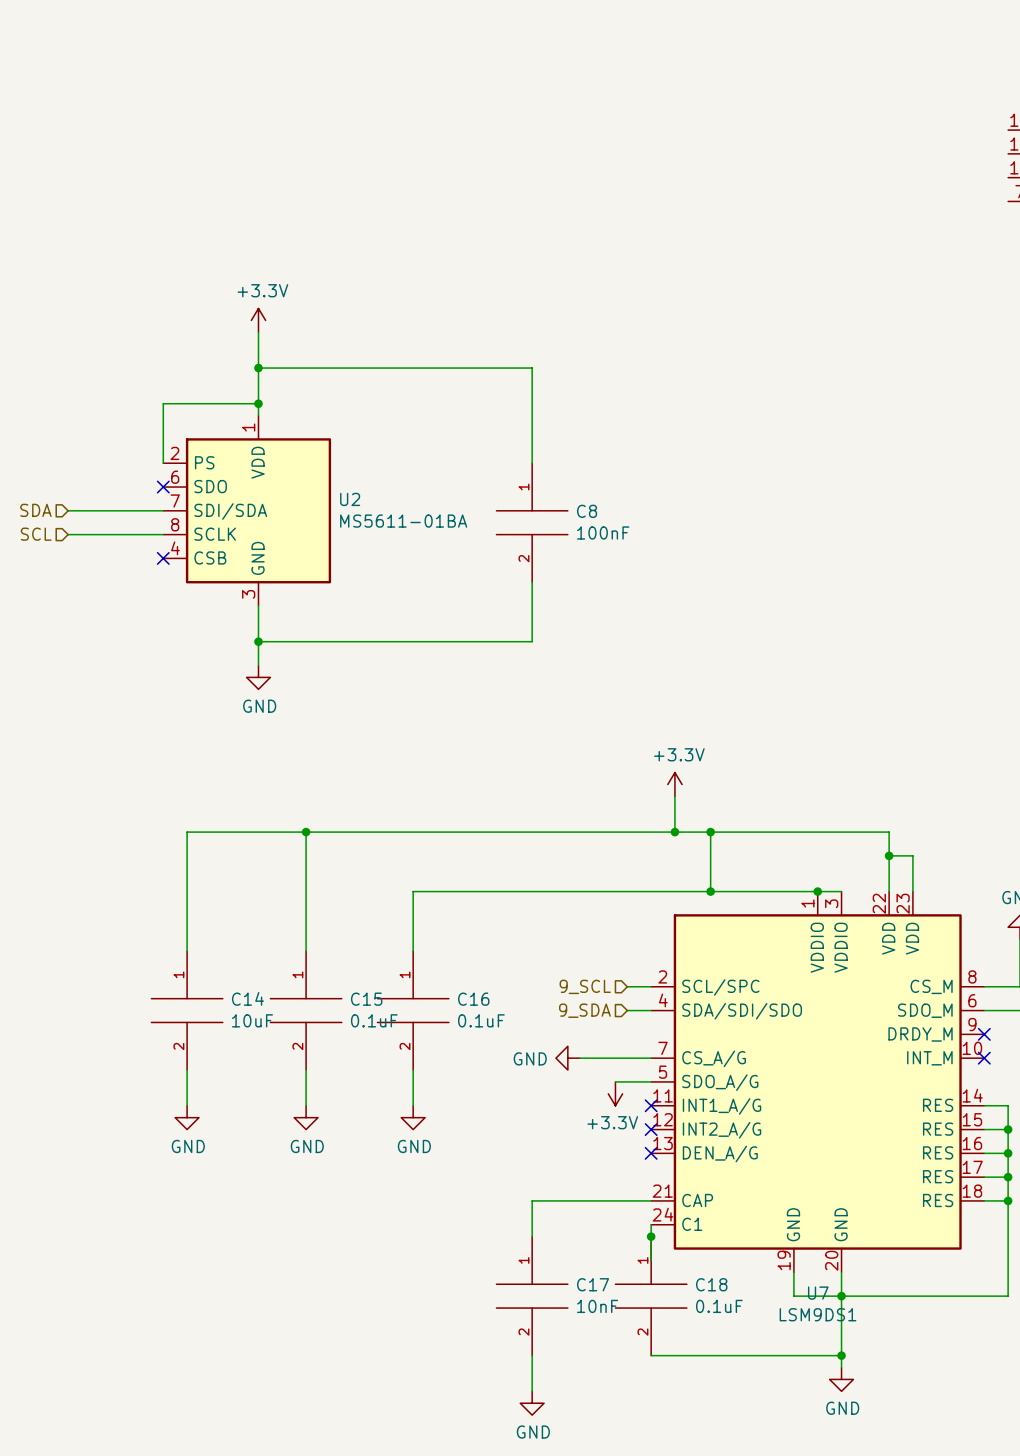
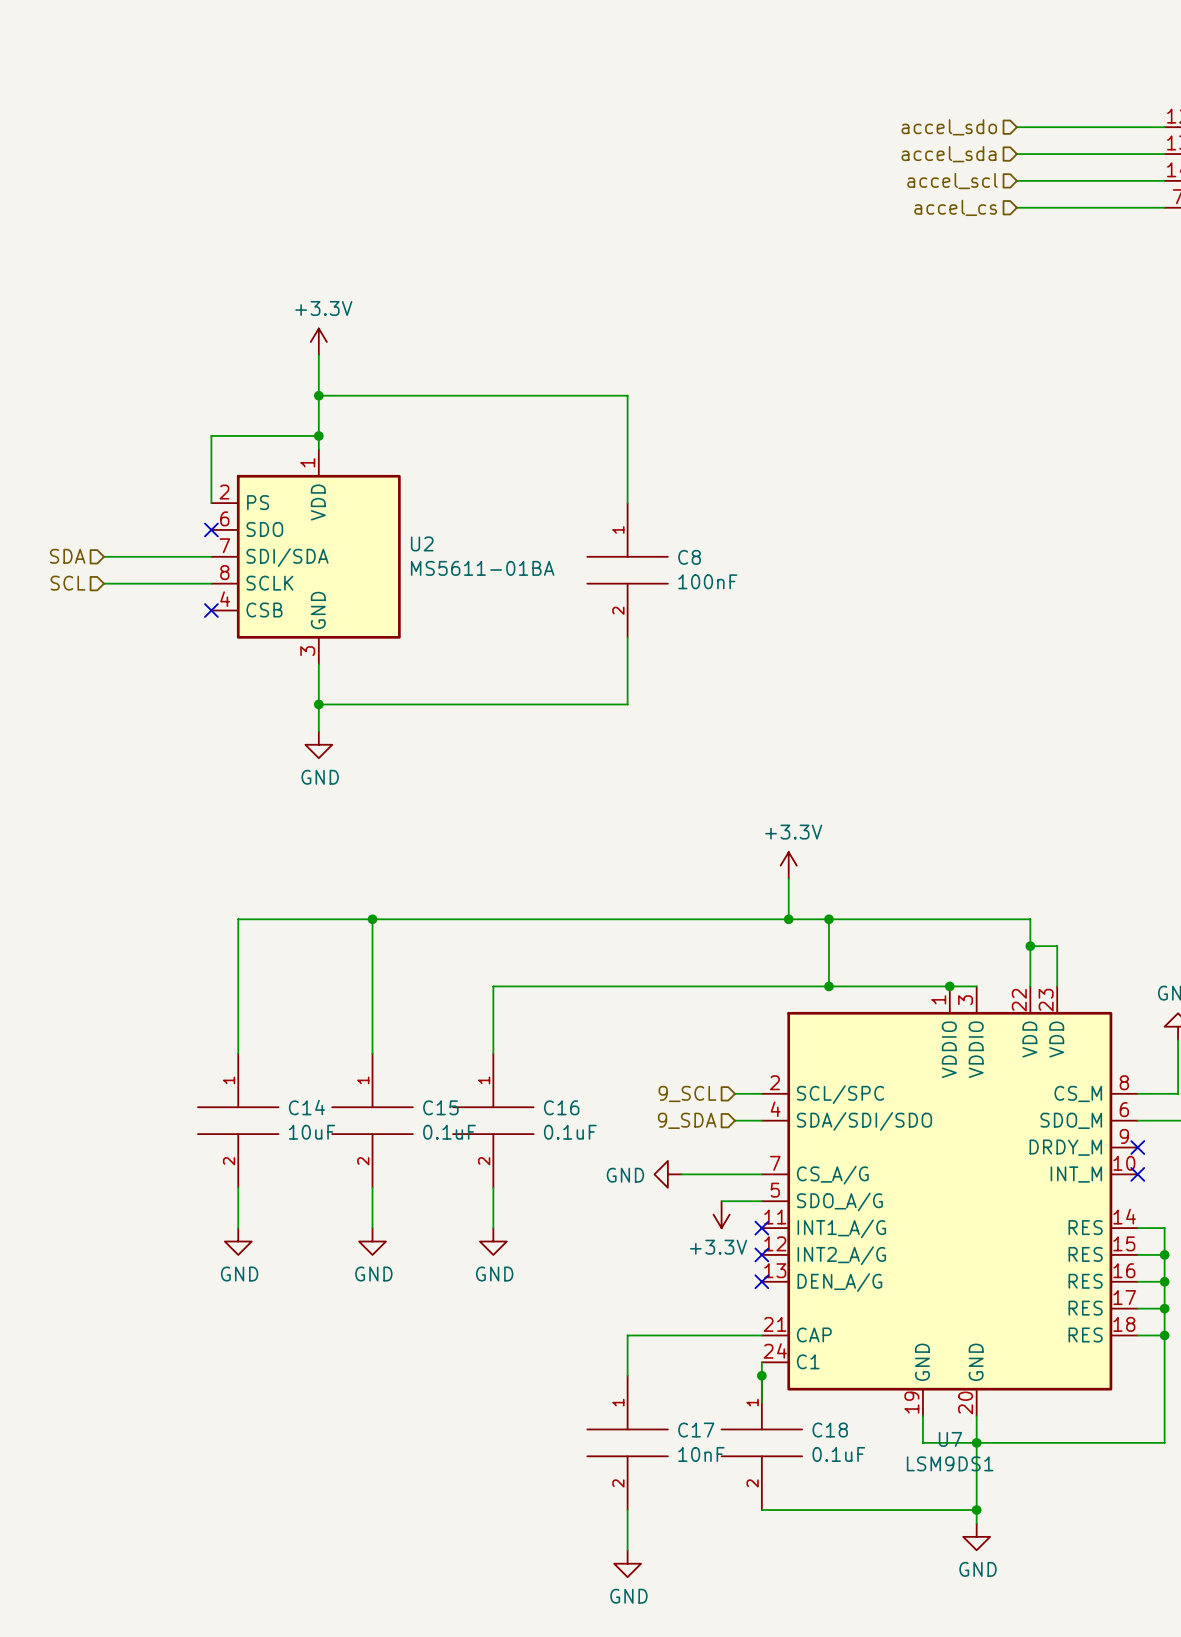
hierarchical label: none -> accel_sdo (949, 127)
wire: none -> (1016, 127) (1164, 127)
hierarchical label: none -> accel_sda (948, 154)
wire: none -> (1016, 154) (1164, 154)
hierarchical label: none -> accel_scl (952, 181)
wire: none -> (1016, 180) (1164, 180)
hierarchical label: none -> accel_cs (955, 207)
wire: none -> (1016, 207) (1164, 207)

